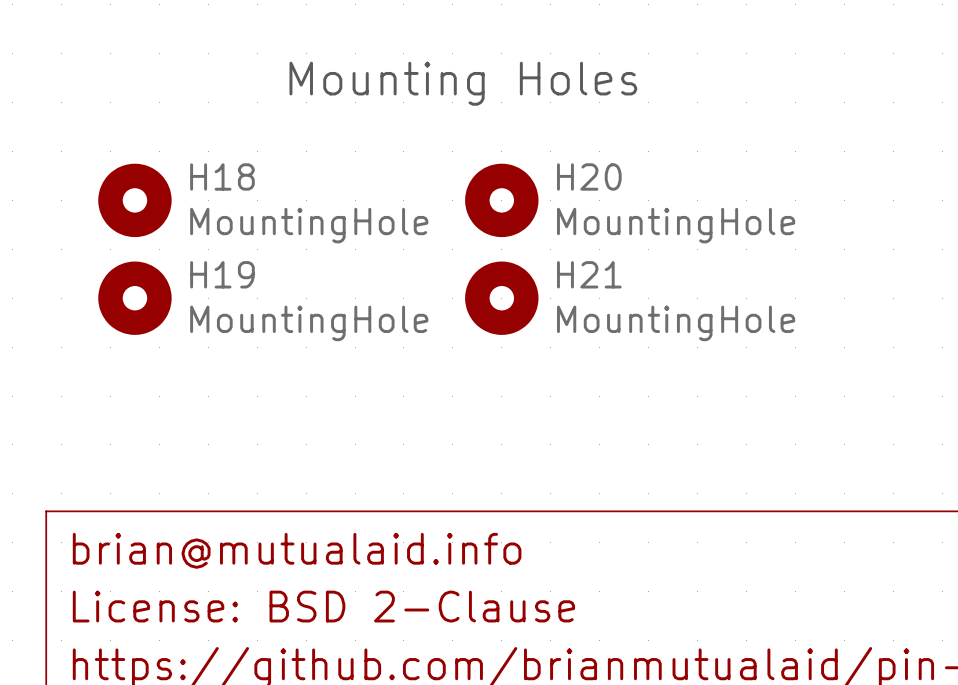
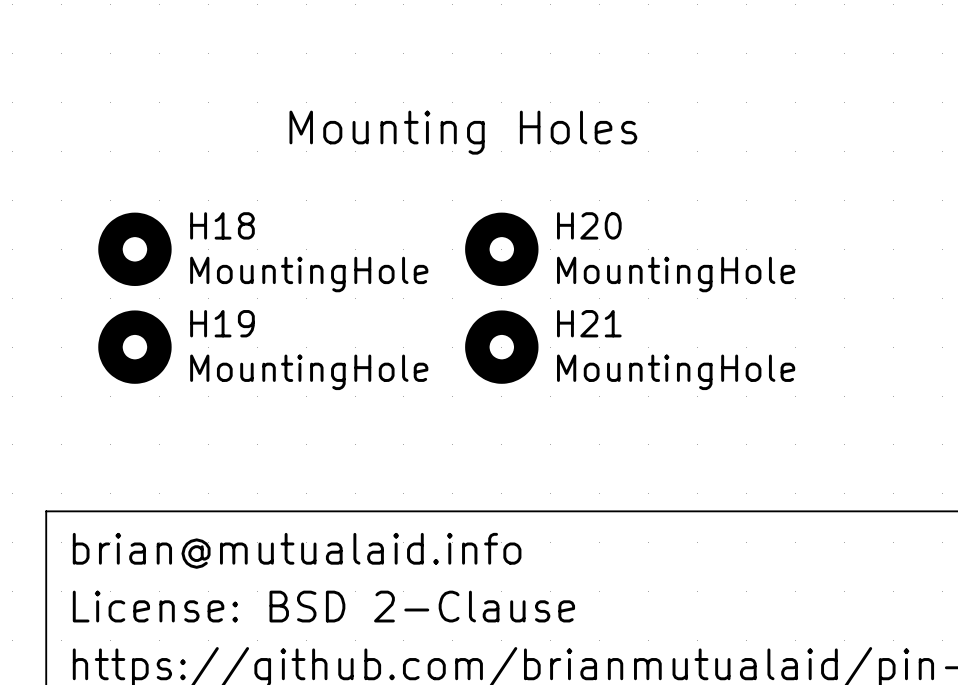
text position: Mounting Holes (463, 83) -> Mounting Holes (463, 132)
H18 position: (134, 200) -> (134, 249)
H20 position: (501, 200) -> (501, 249)
H19 position: (134, 298) -> (134, 347)
H21 position: (501, 298) -> (501, 347)

